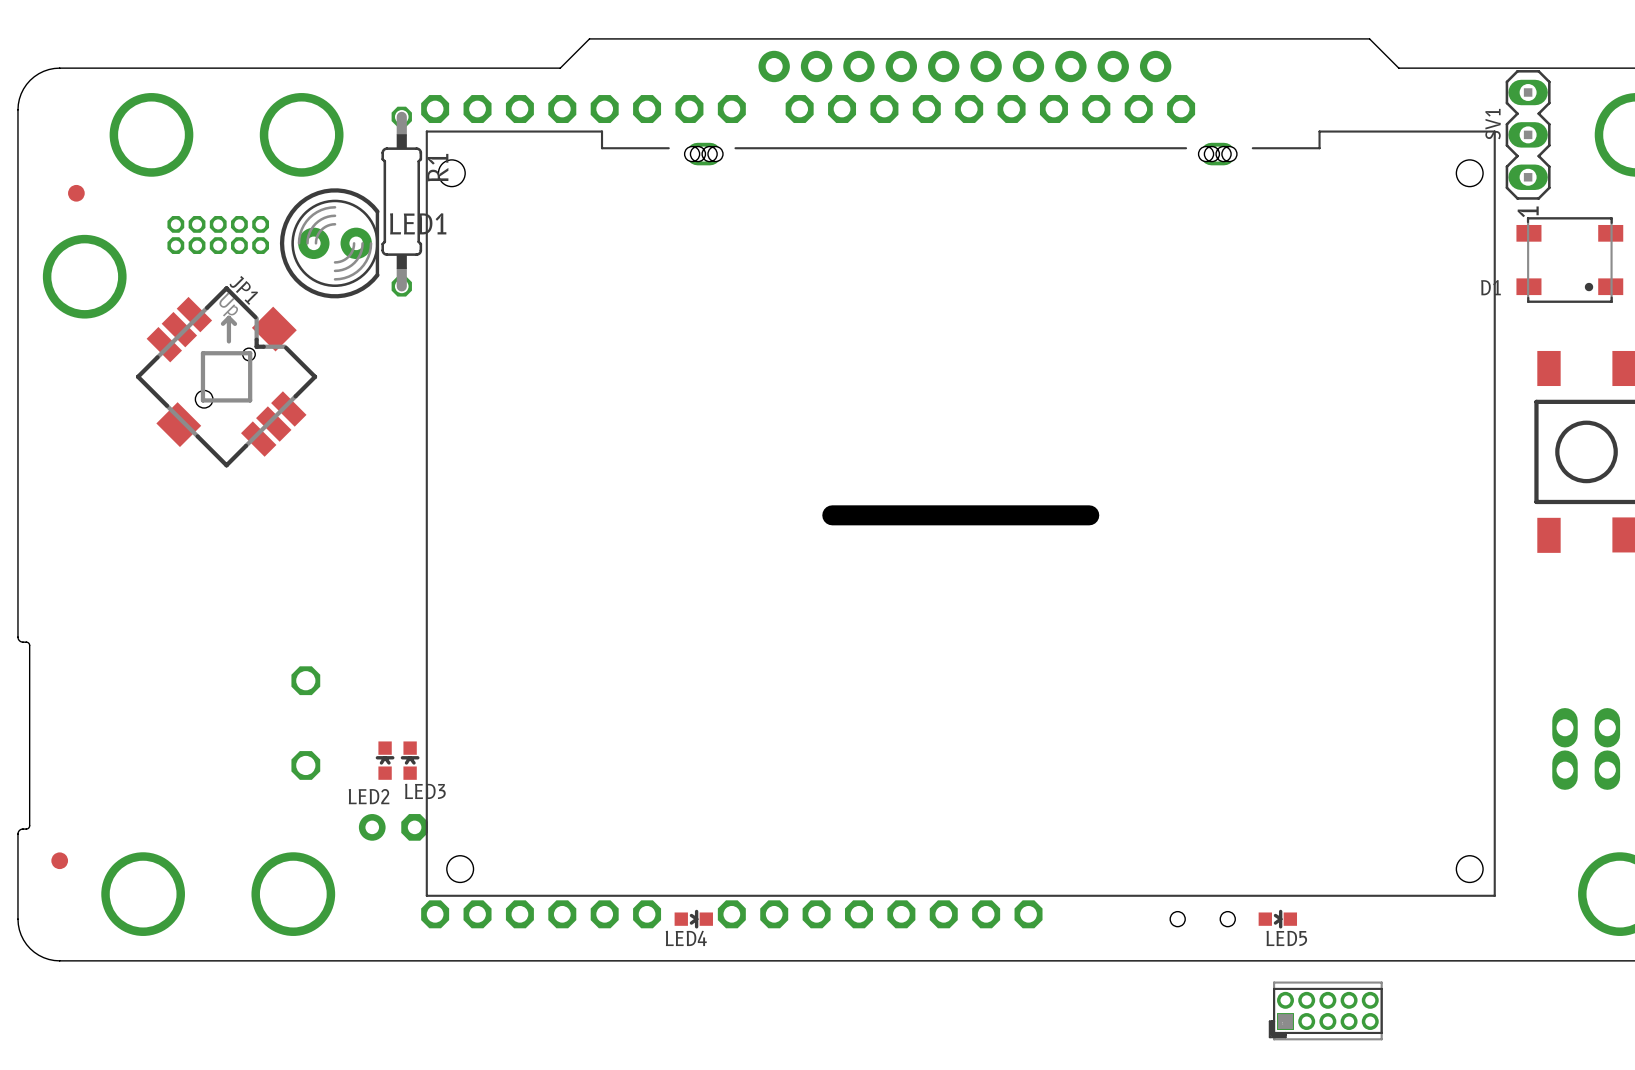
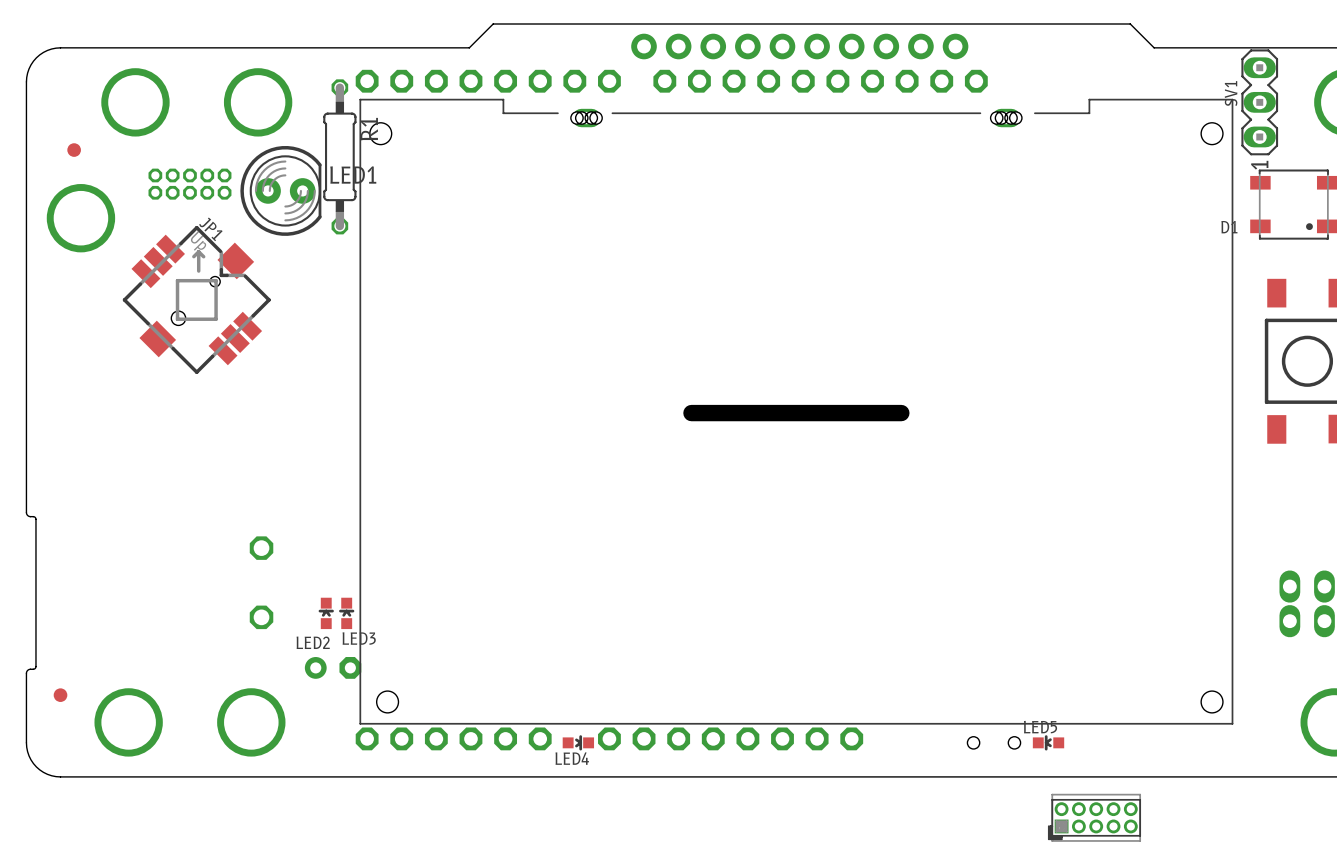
LED5 rotation: 0° (1277, 919) -> 180° (1048, 742)

